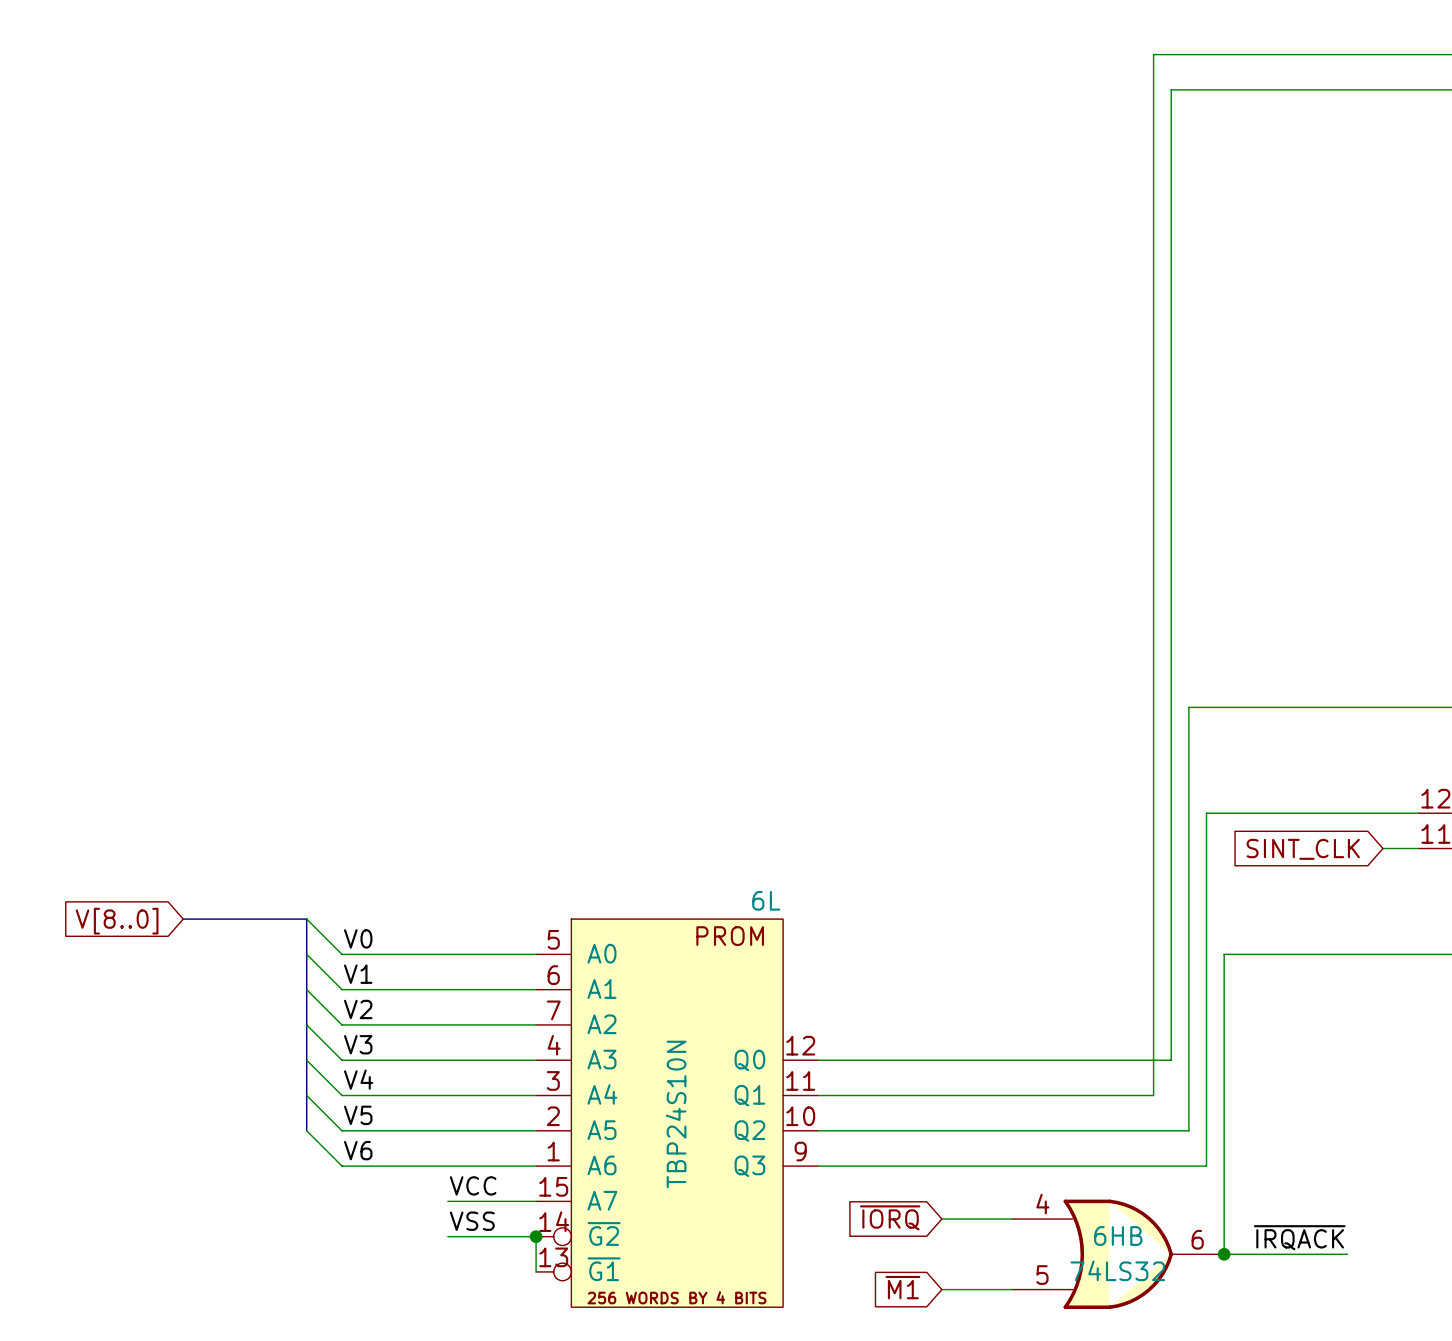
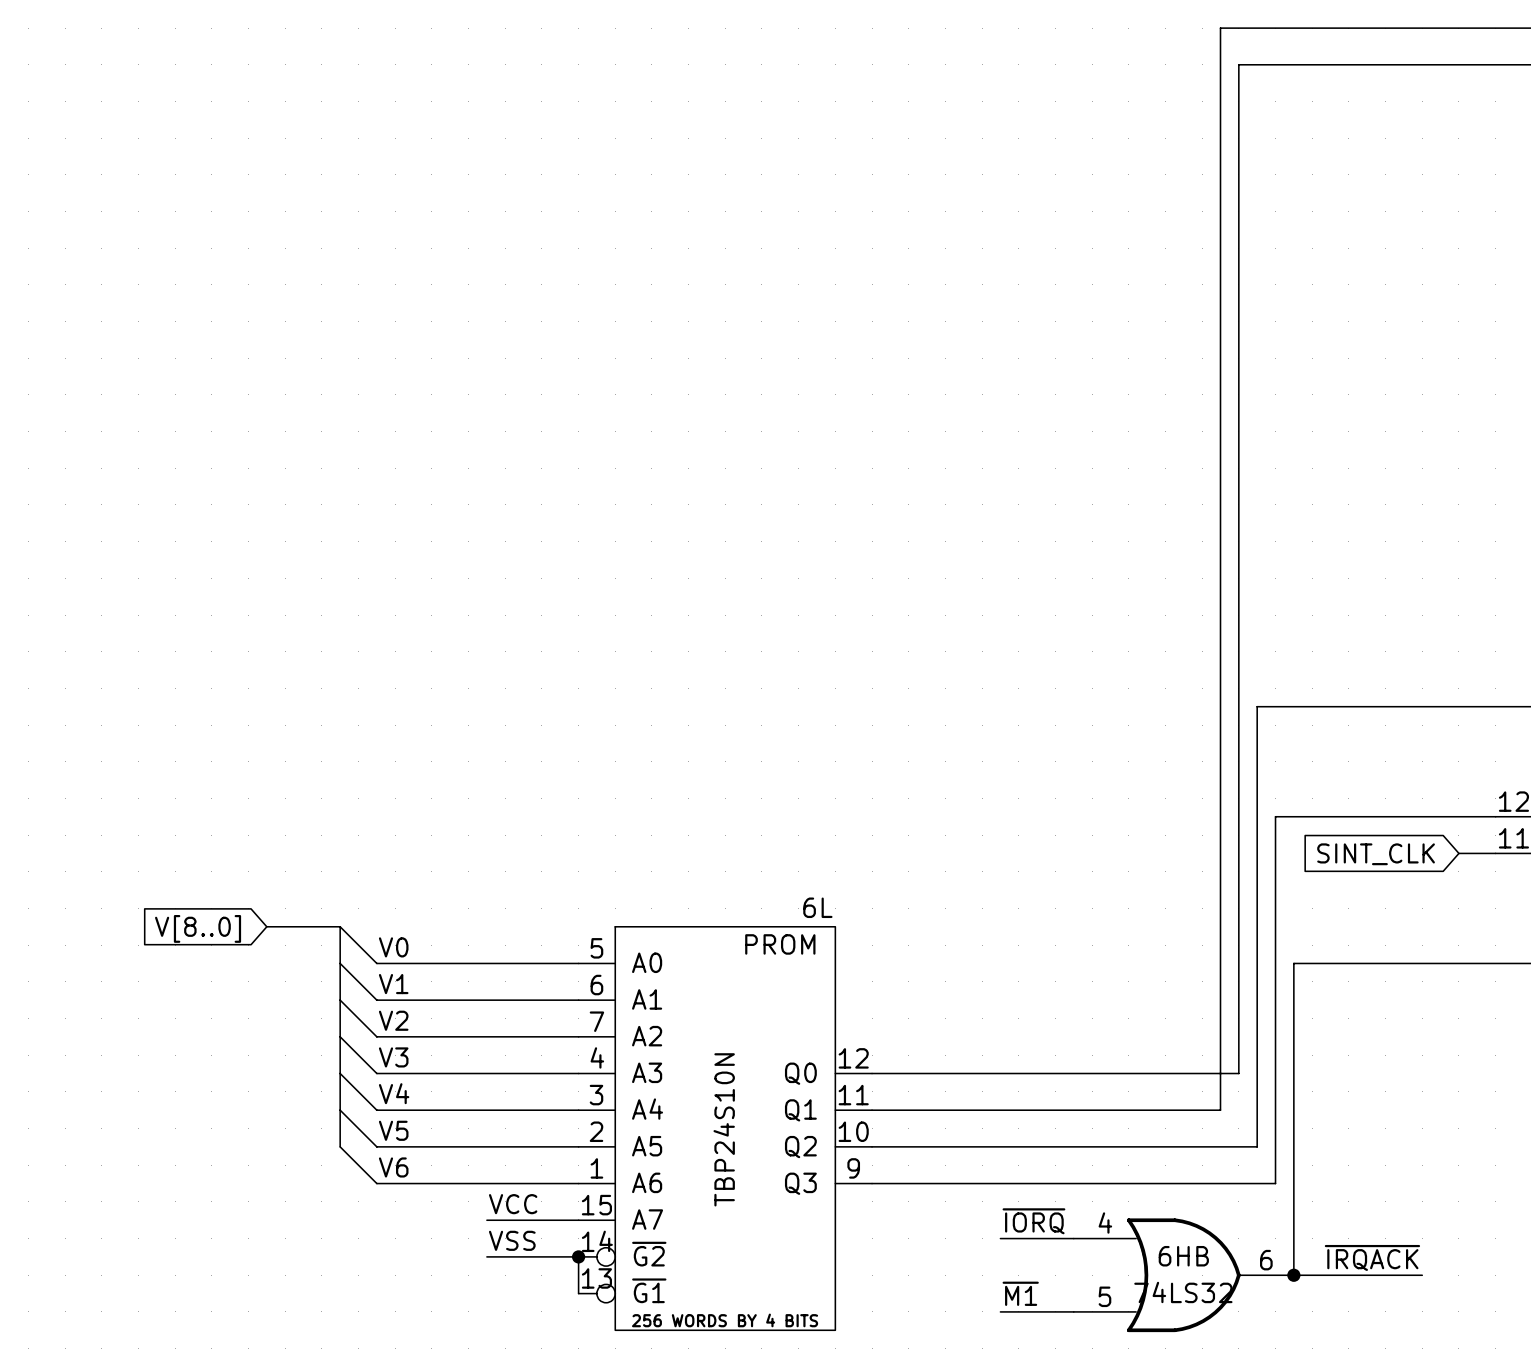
bus: (183, 919) (236, 919) -> none
global label position: V[8..0] (117, 921) -> V[8..0] (198, 928)
label: none -> ~{IORQ} (1033, 1221)
global label: ~{IORQ} (890, 1217) -> none
label: none -> ~{M1} (1020, 1293)
global label: ~{M1} (902, 1287) -> none

